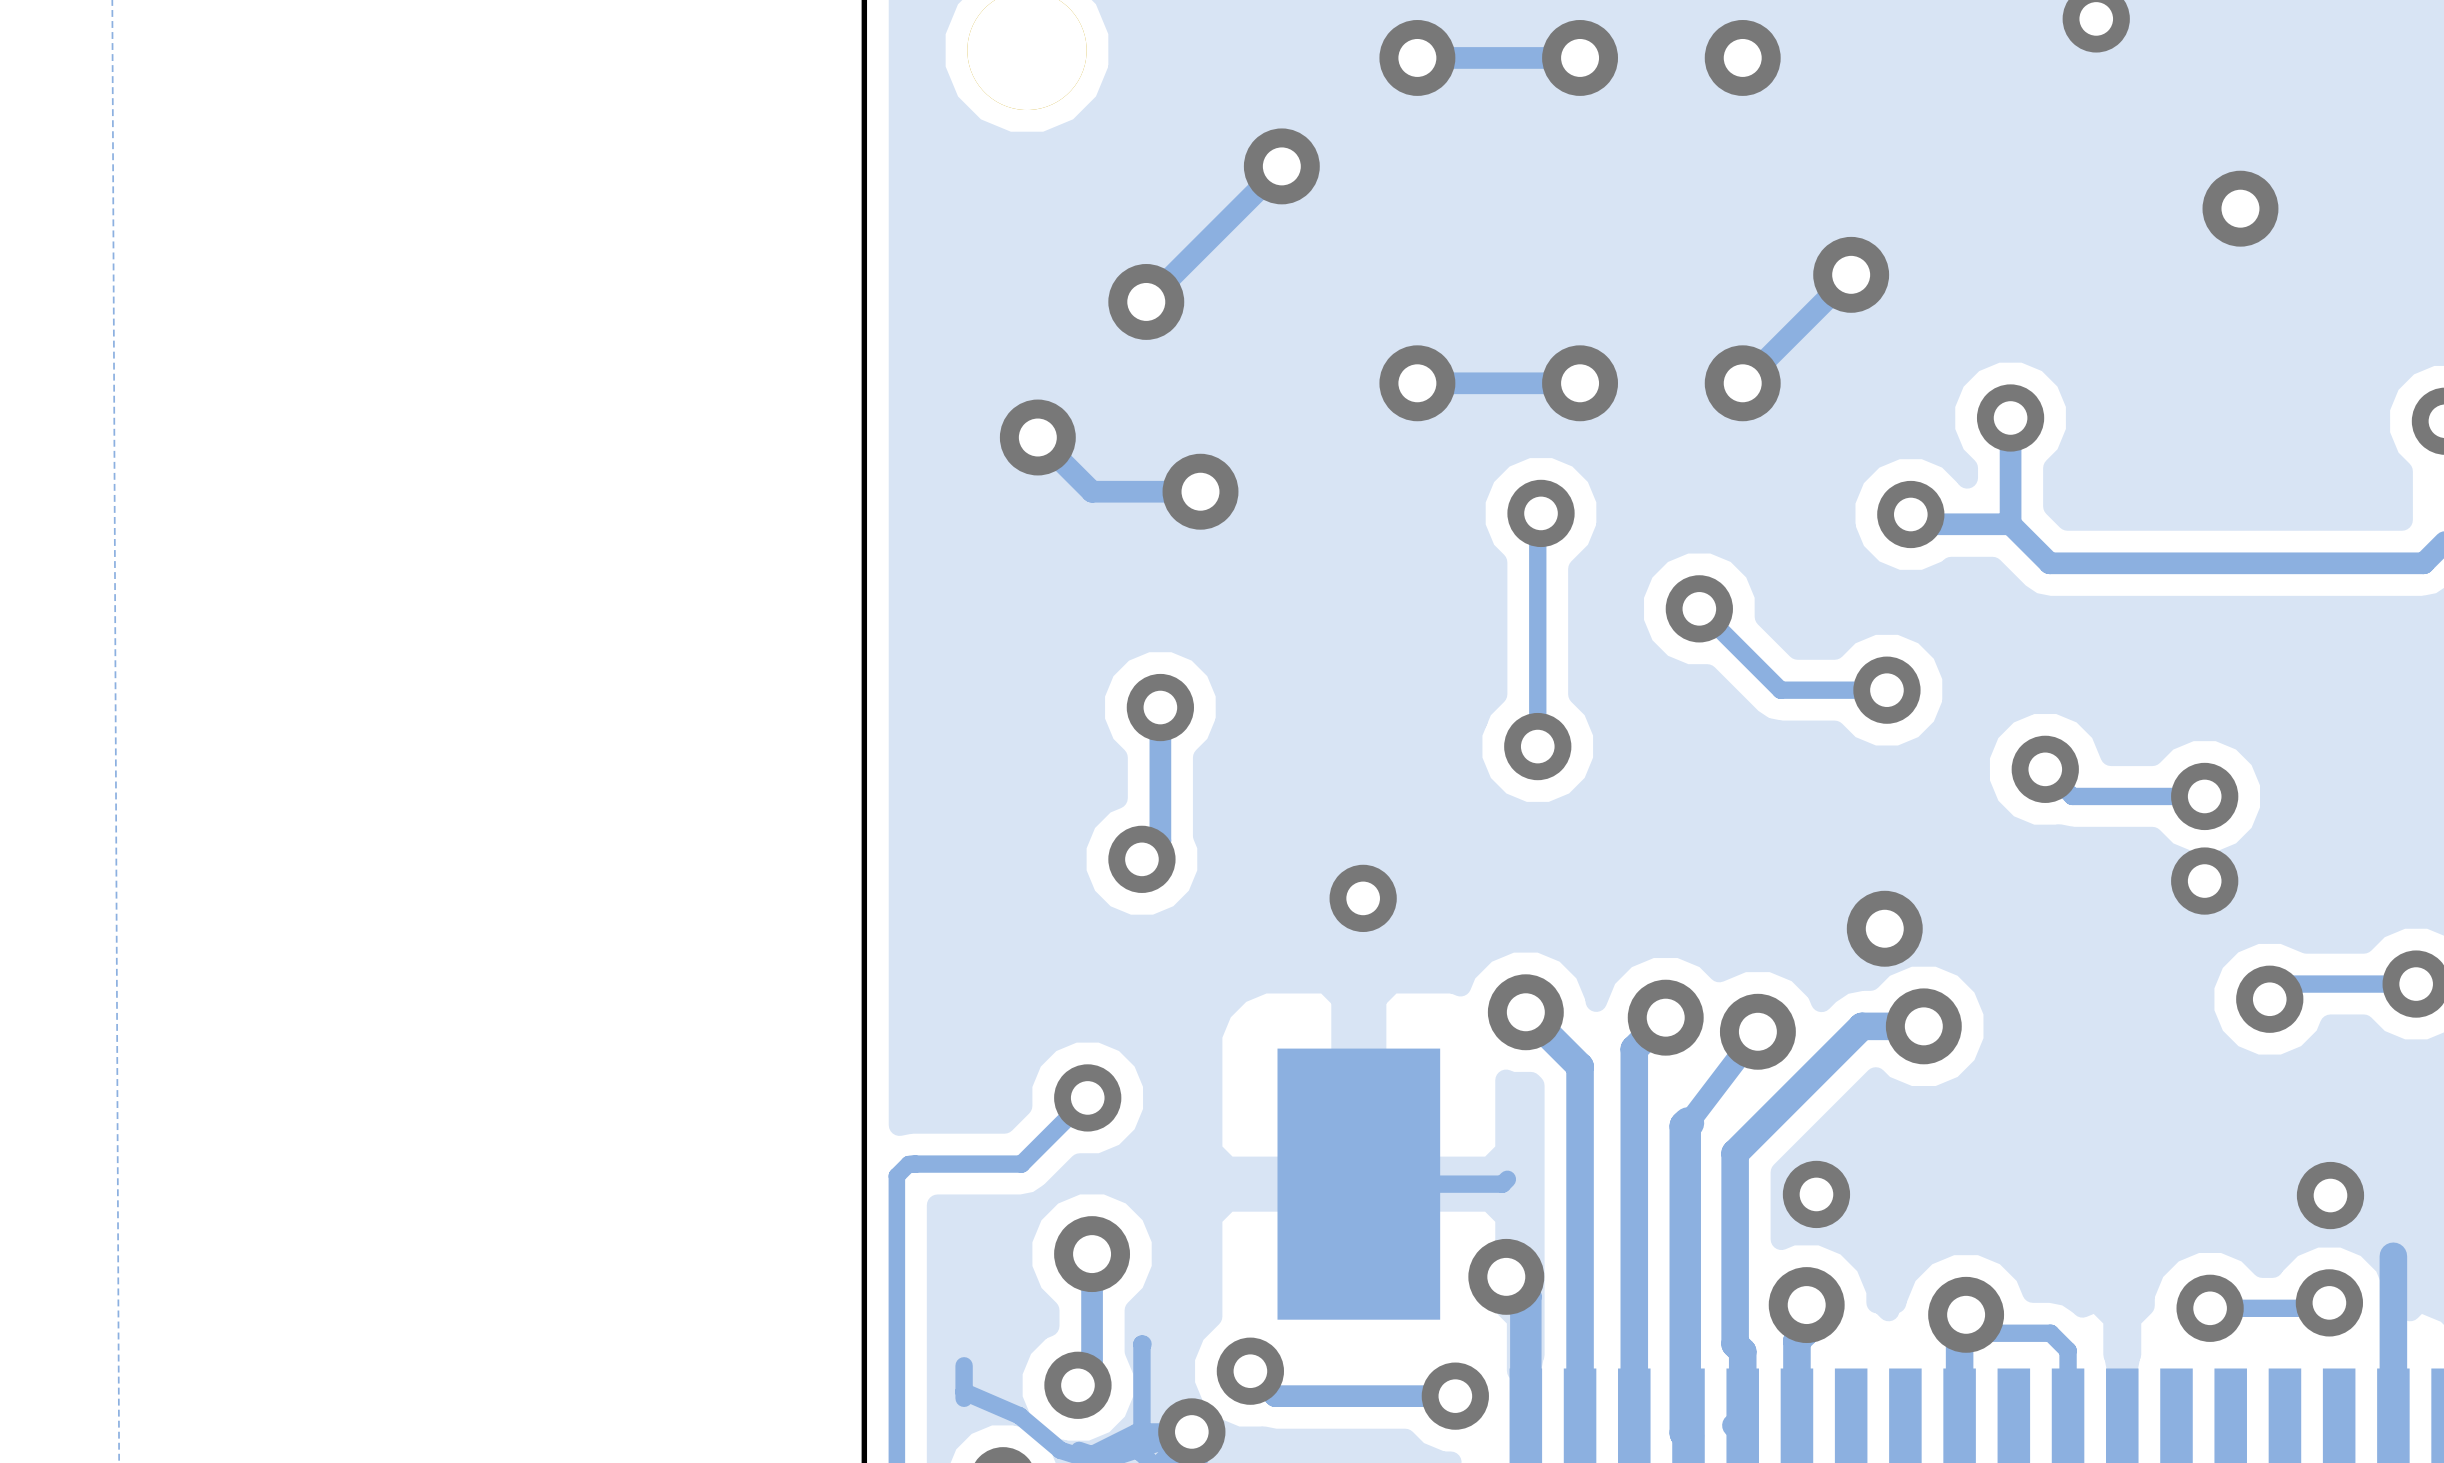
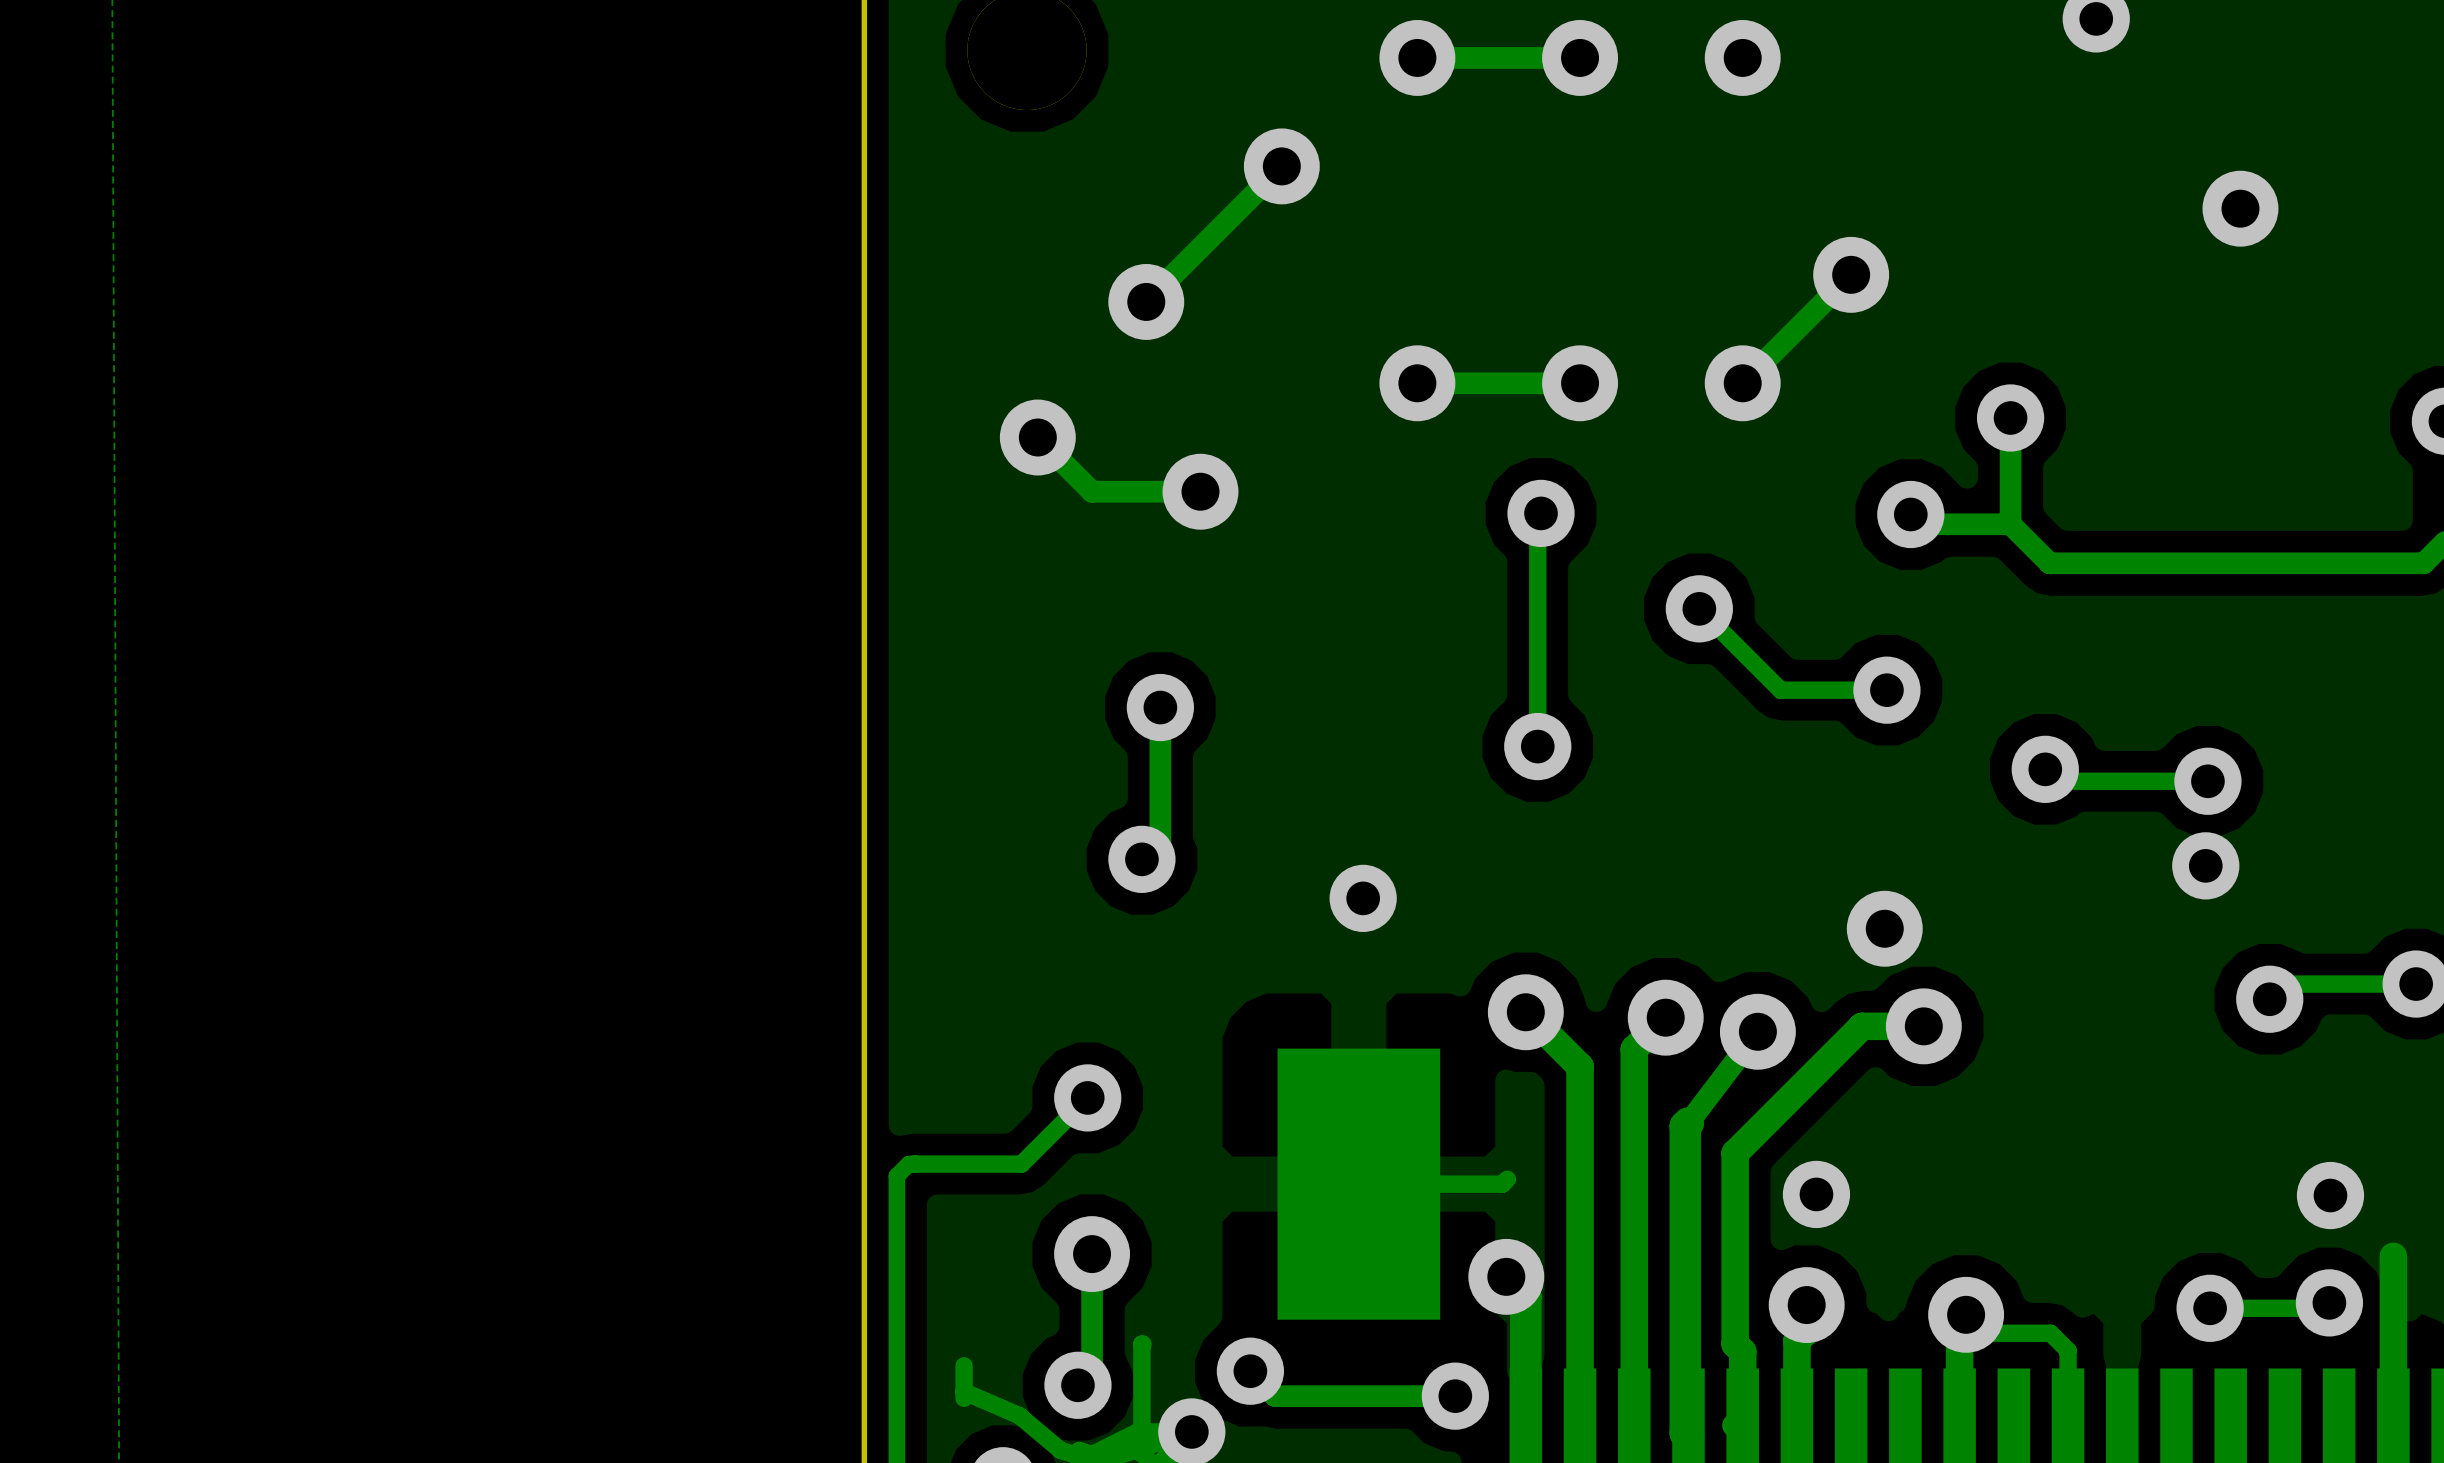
track: (2057, 781) (2072, 796) (2204, 796) -> (2057, 781) (2207, 781)
via position: (2204, 796) -> (2207, 781)
via position: (2204, 881) -> (2205, 865)

